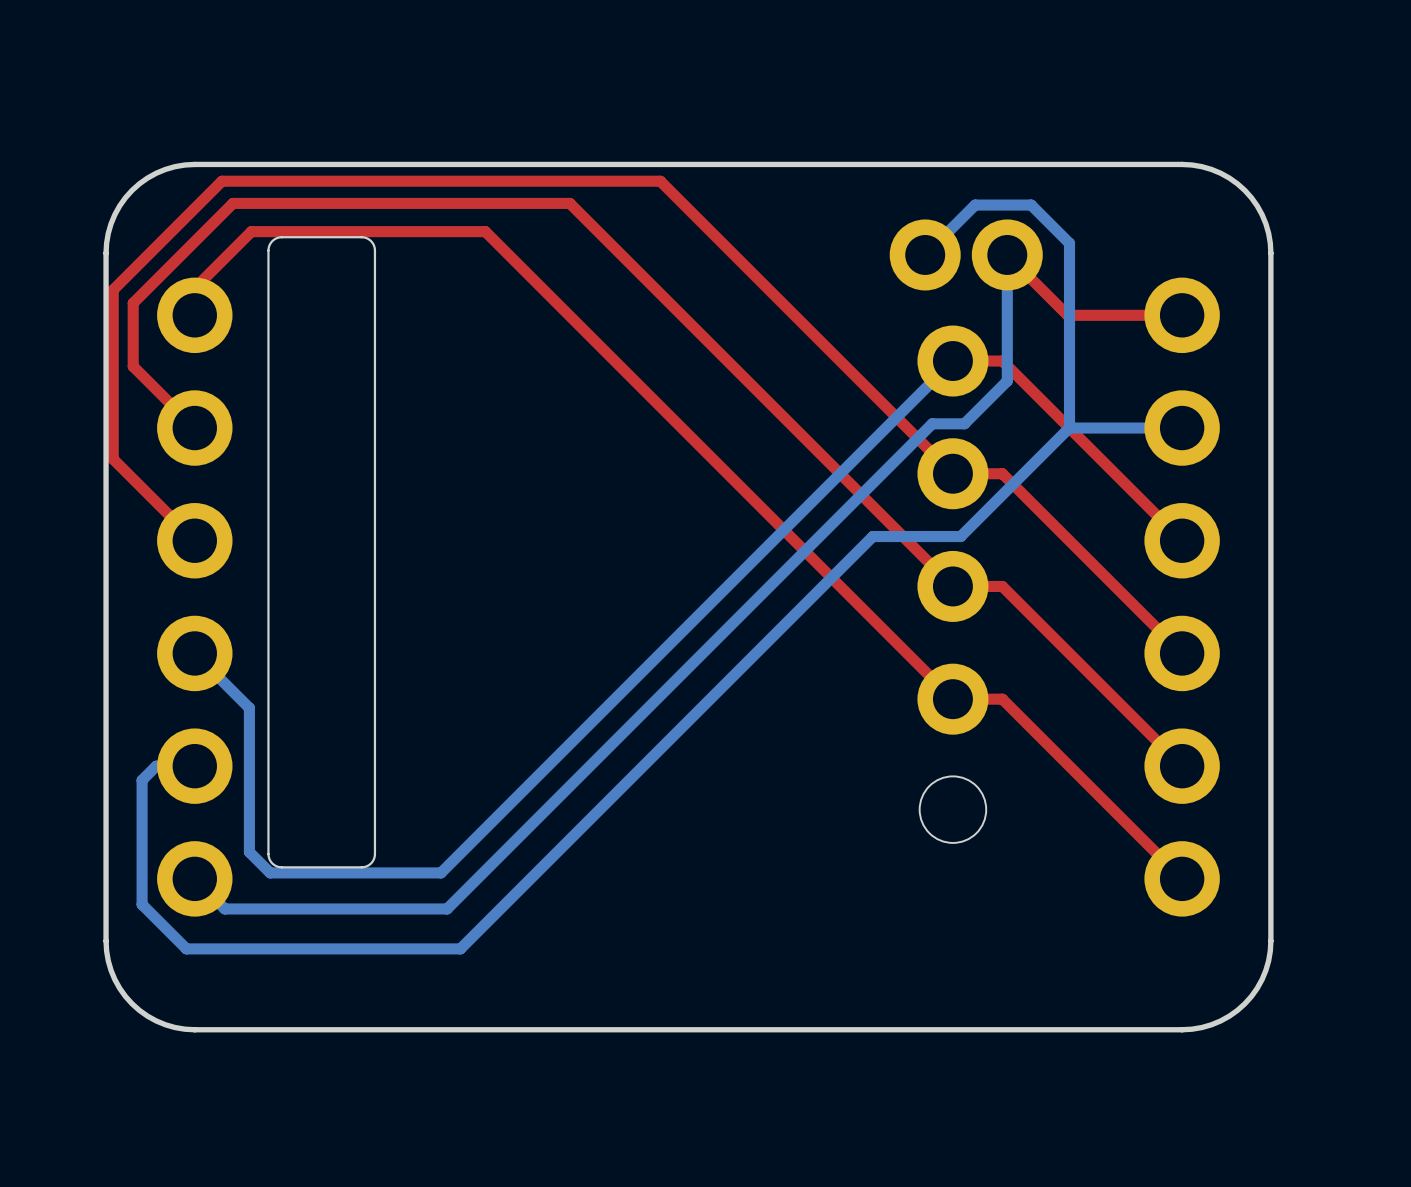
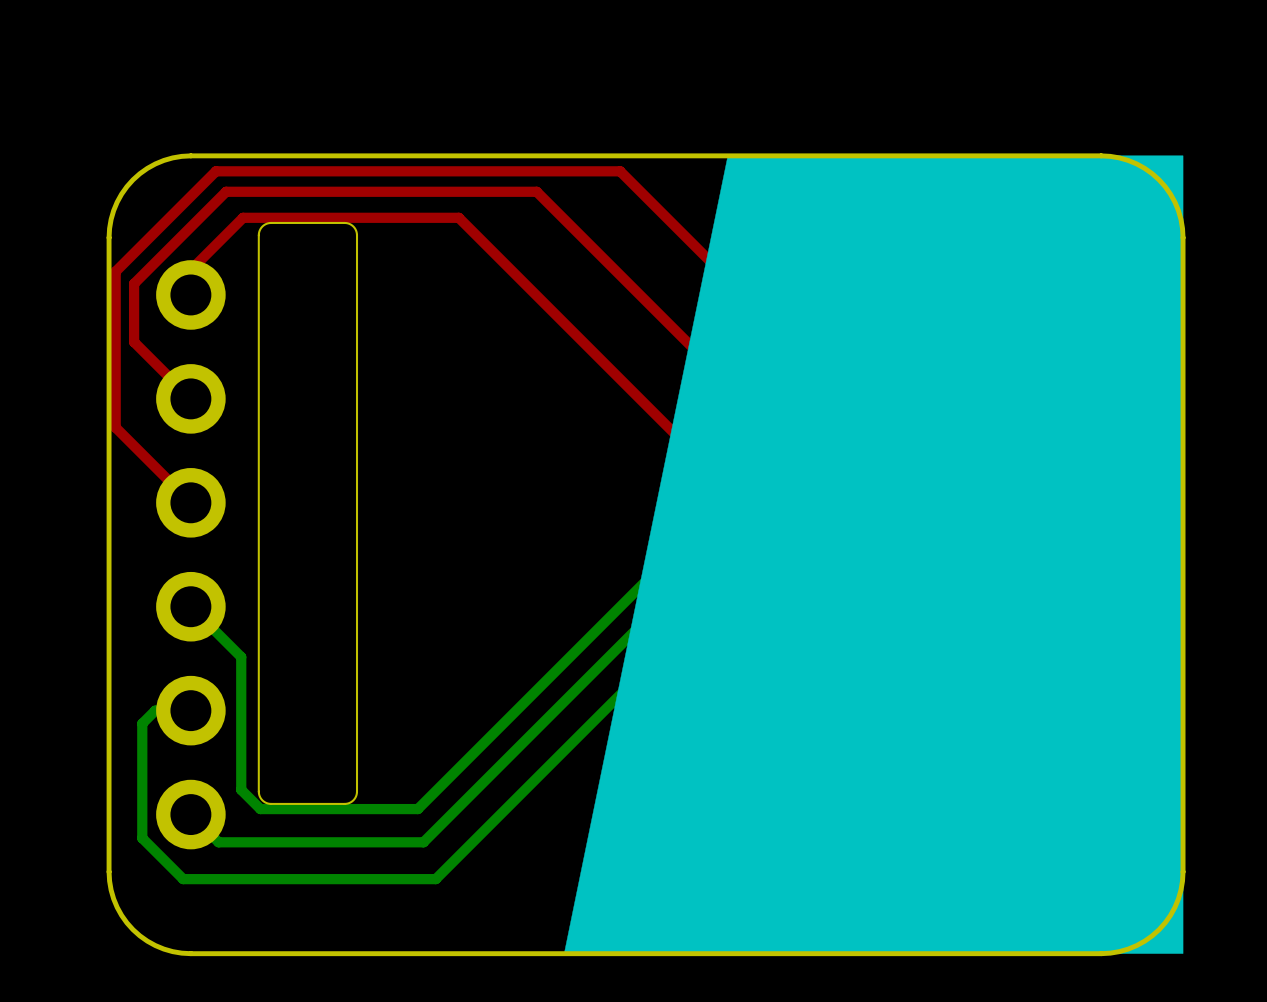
drawing: none -> [564, 155, 1184, 954]

